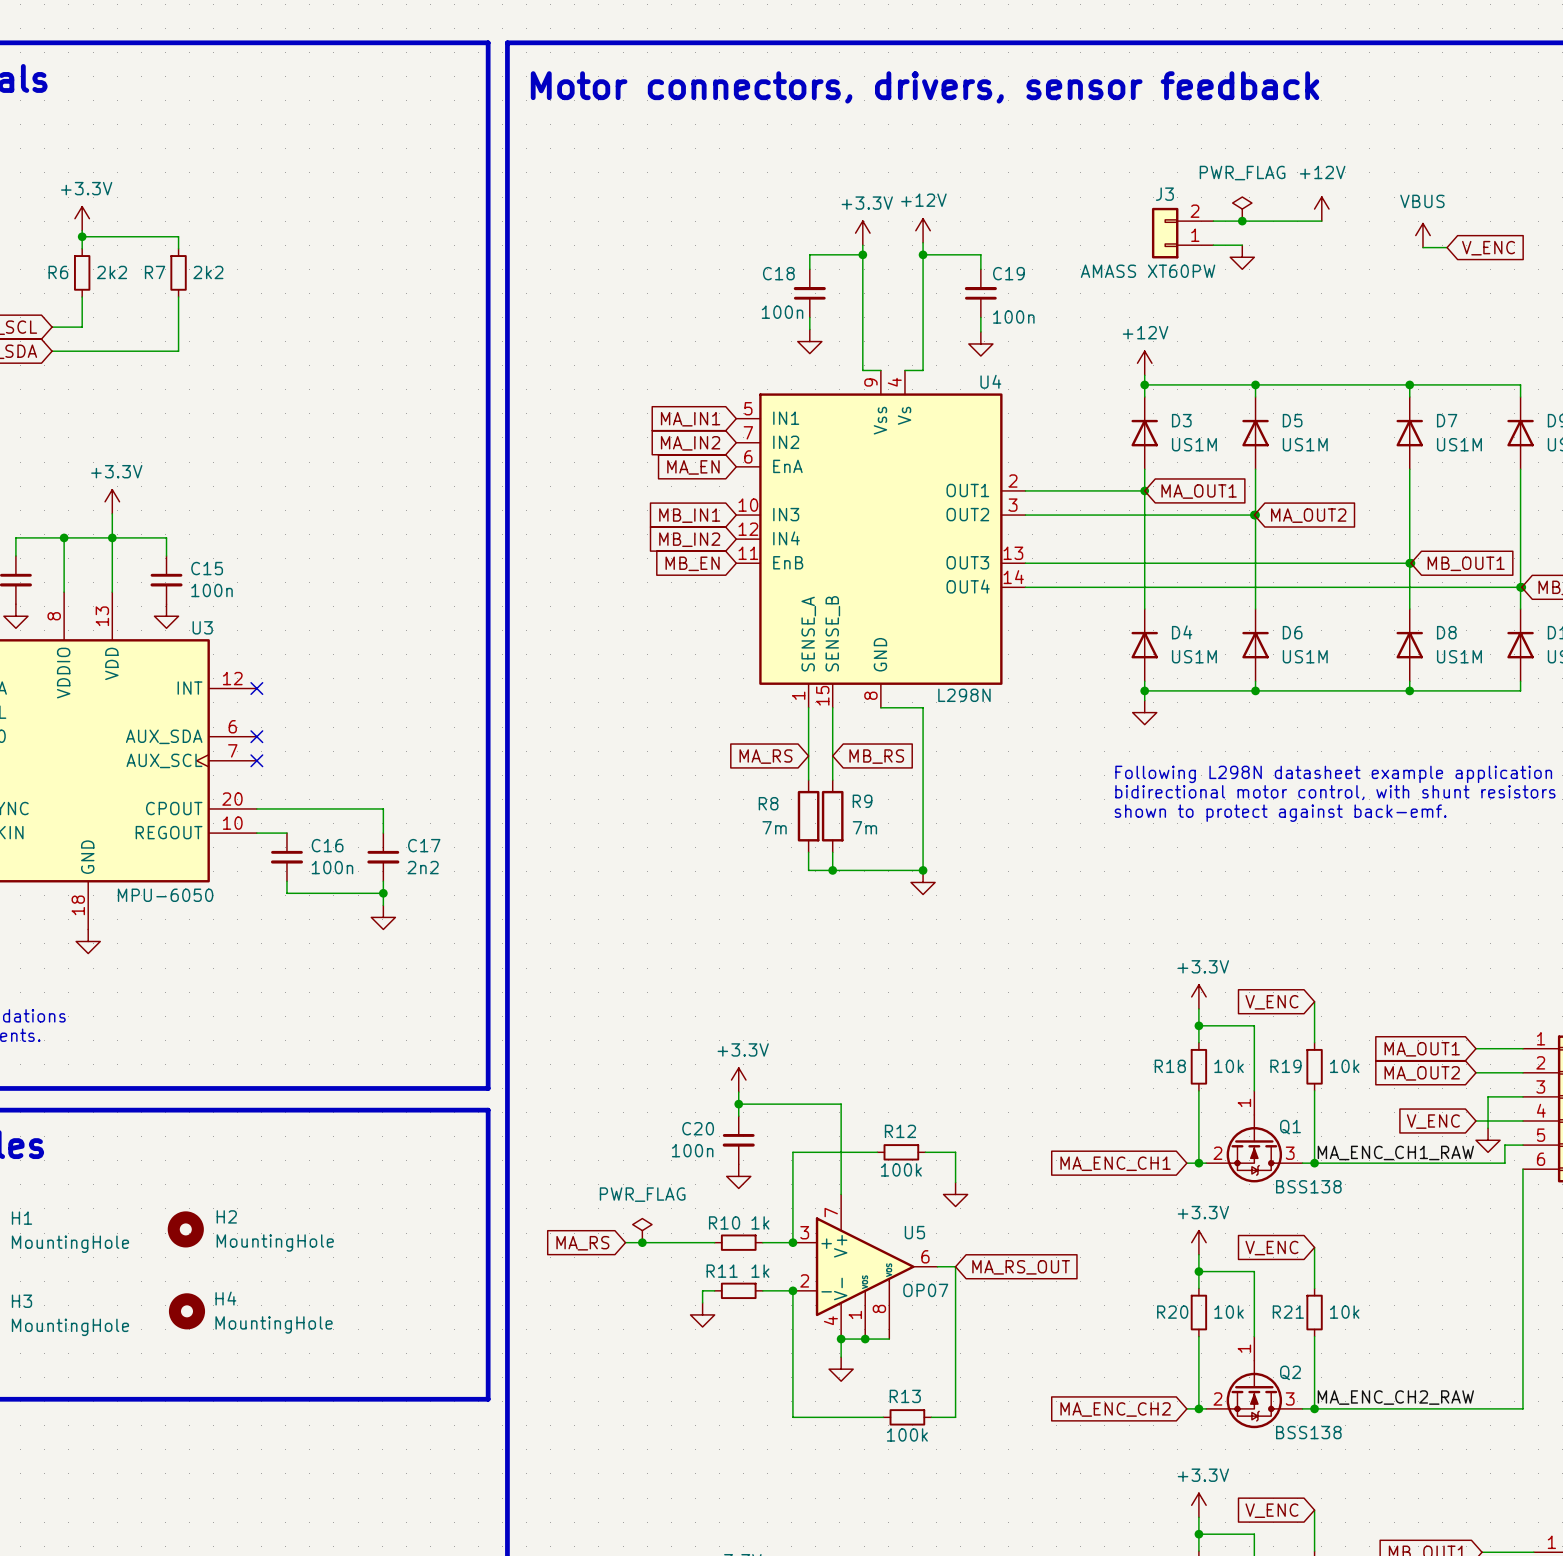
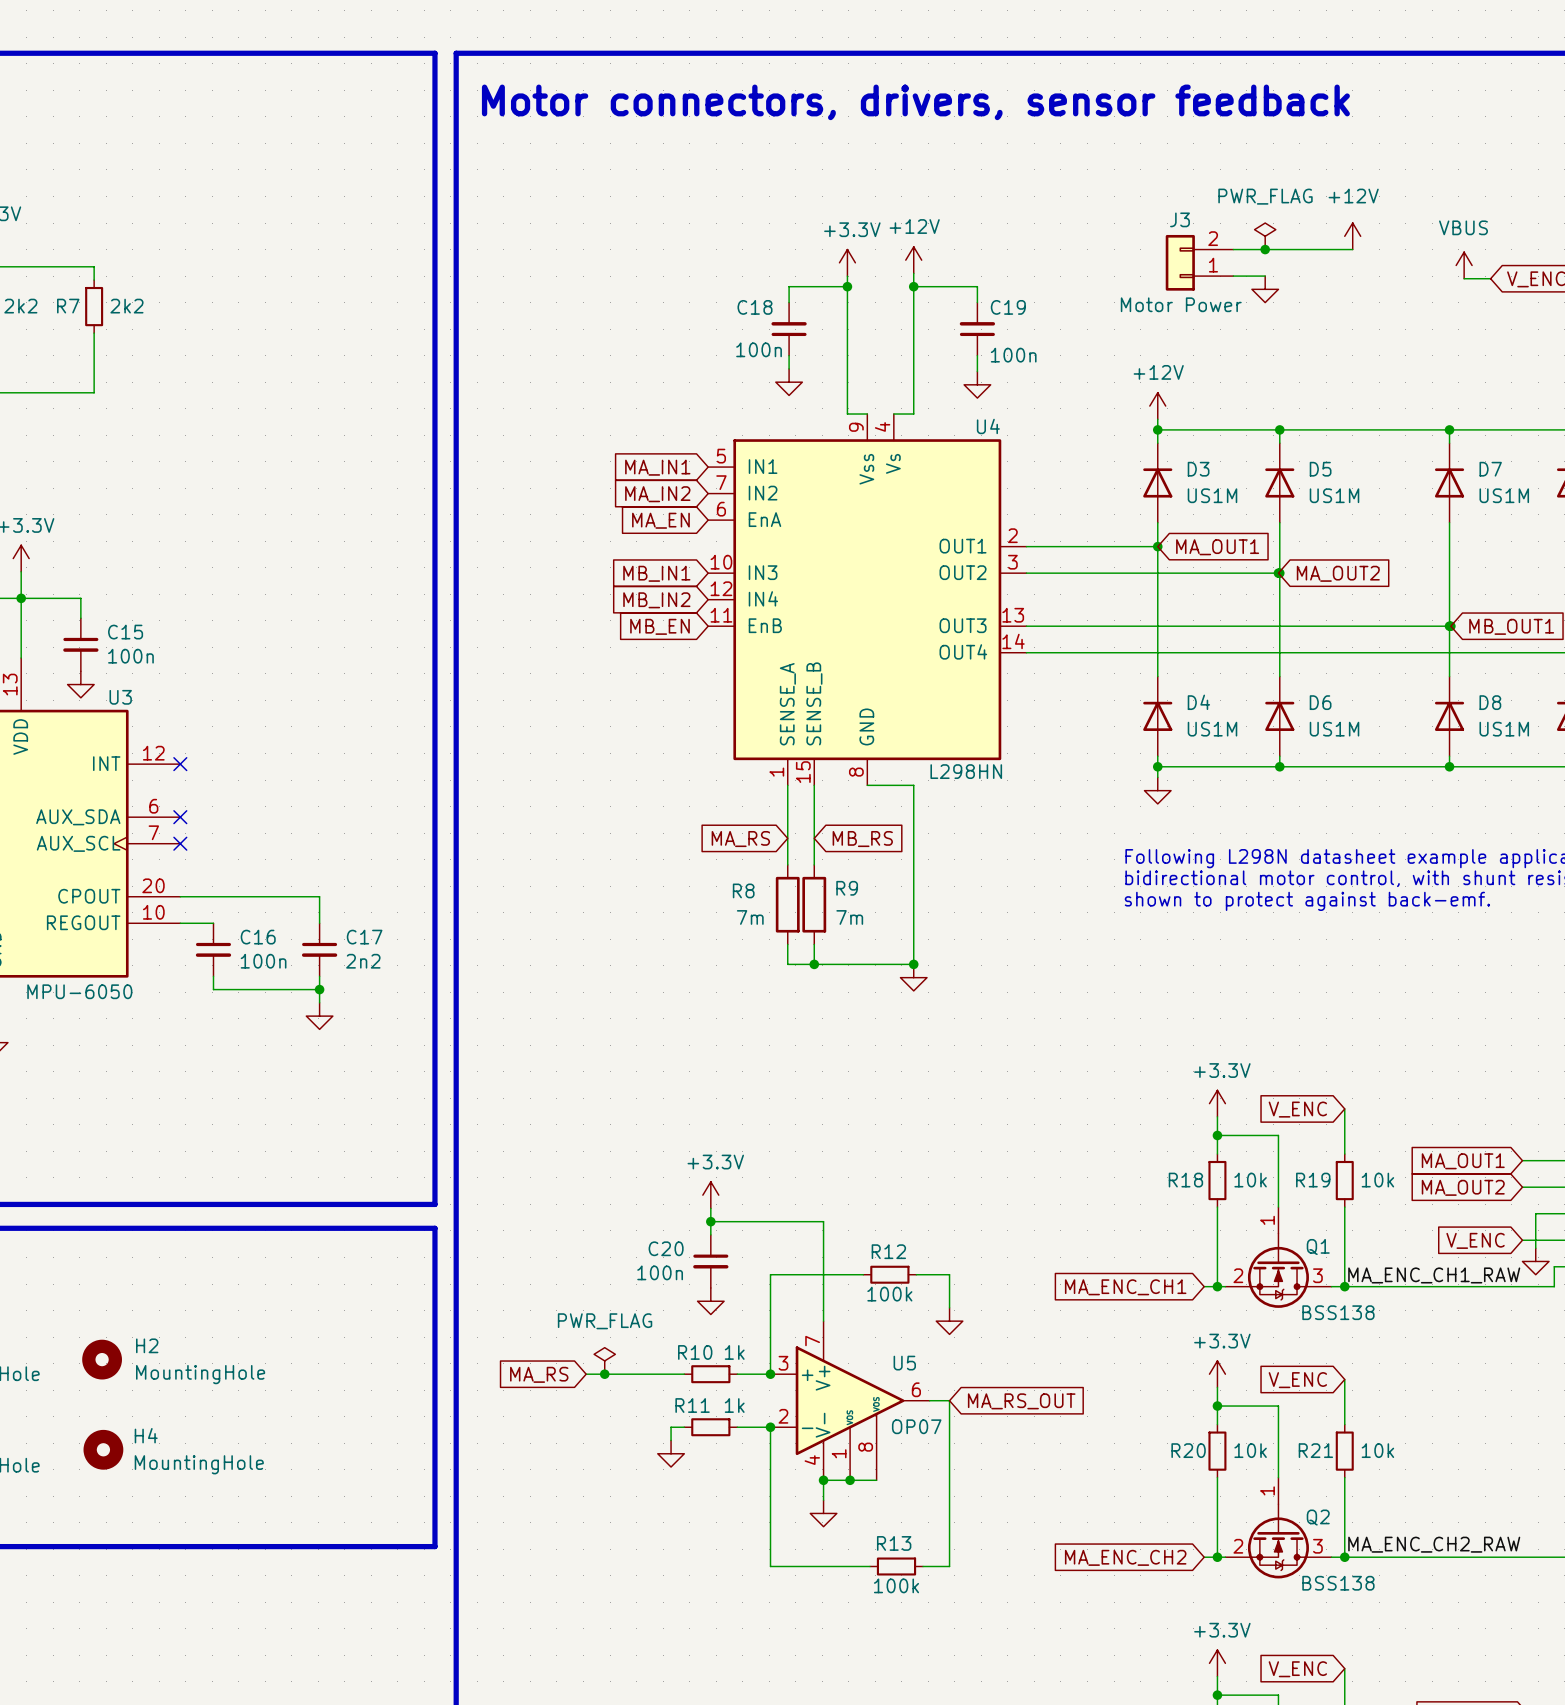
J3 value: AMASS XT60PW (1148, 271) -> Motor Power (1181, 304)
U4 value: L298N (964, 695) -> L298HN (966, 771)

